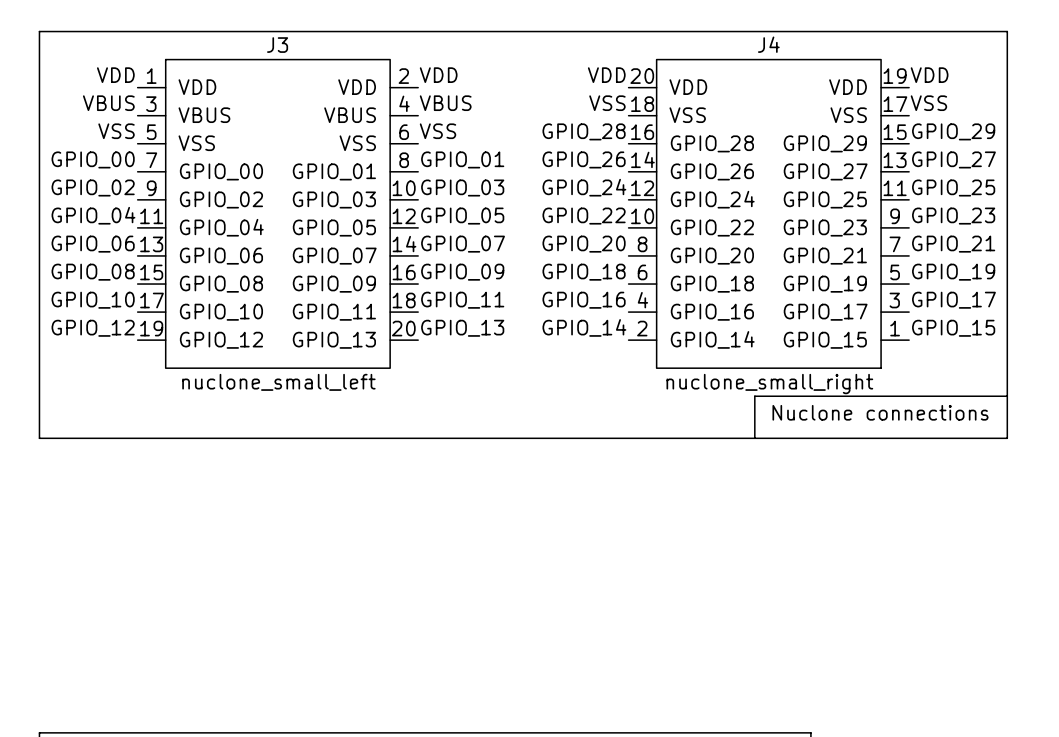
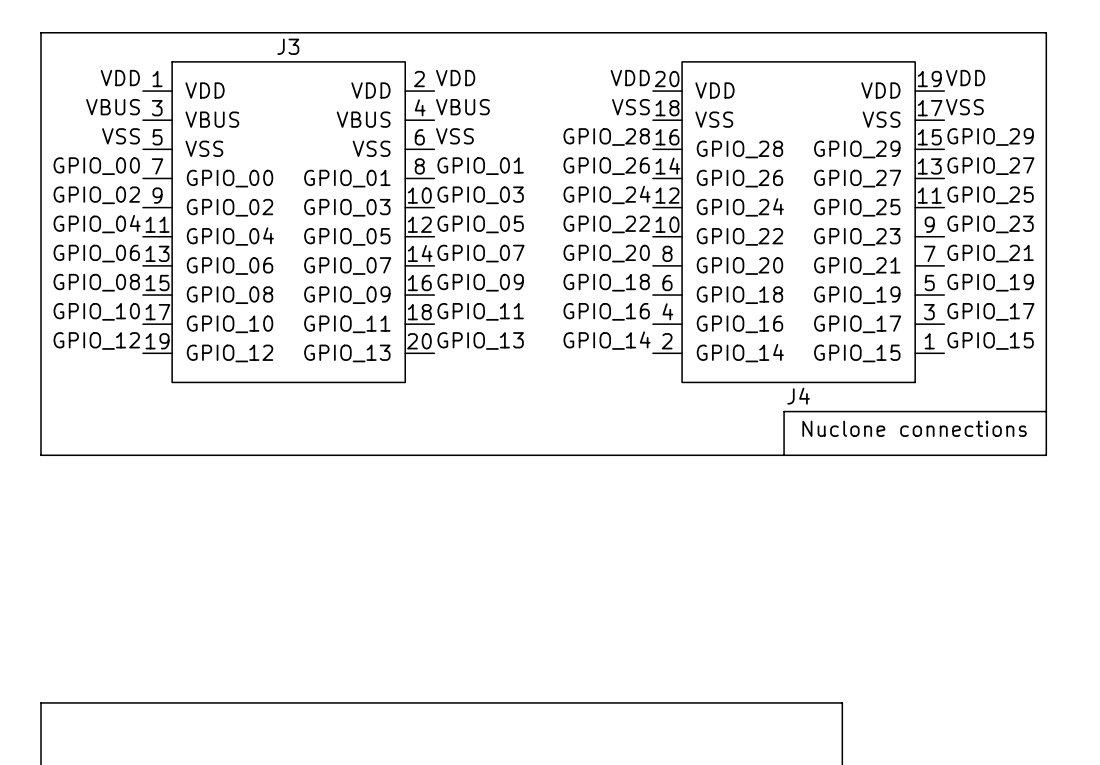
J4 name position: J4 (768, 44) -> J4 (798, 396)
J3 value: nuclone_small_left (278, 382) -> none
J4 value: nuclone_small_right (769, 384) -> none
line: (39, 732) (810, 732) -> (40, 761) (40, 702) (842, 702) (842, 761)

